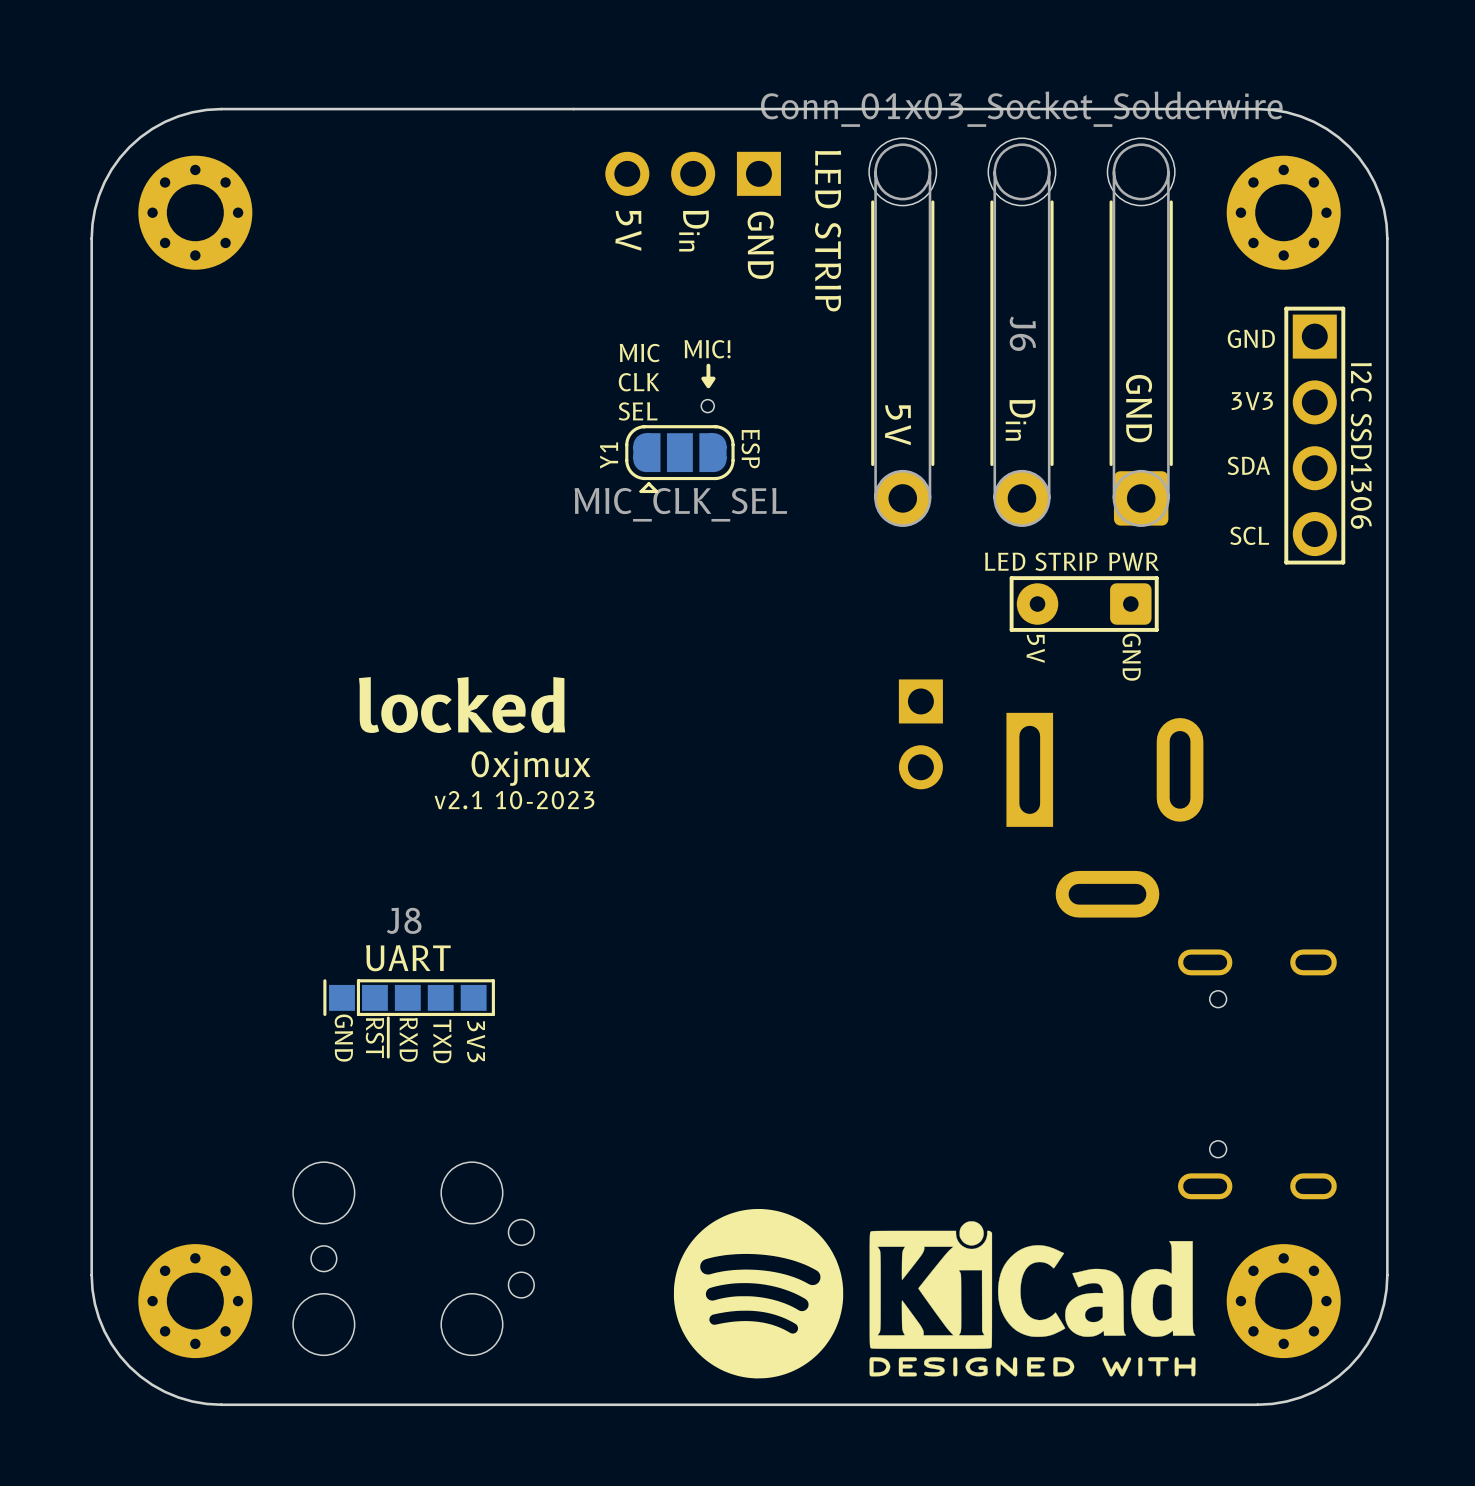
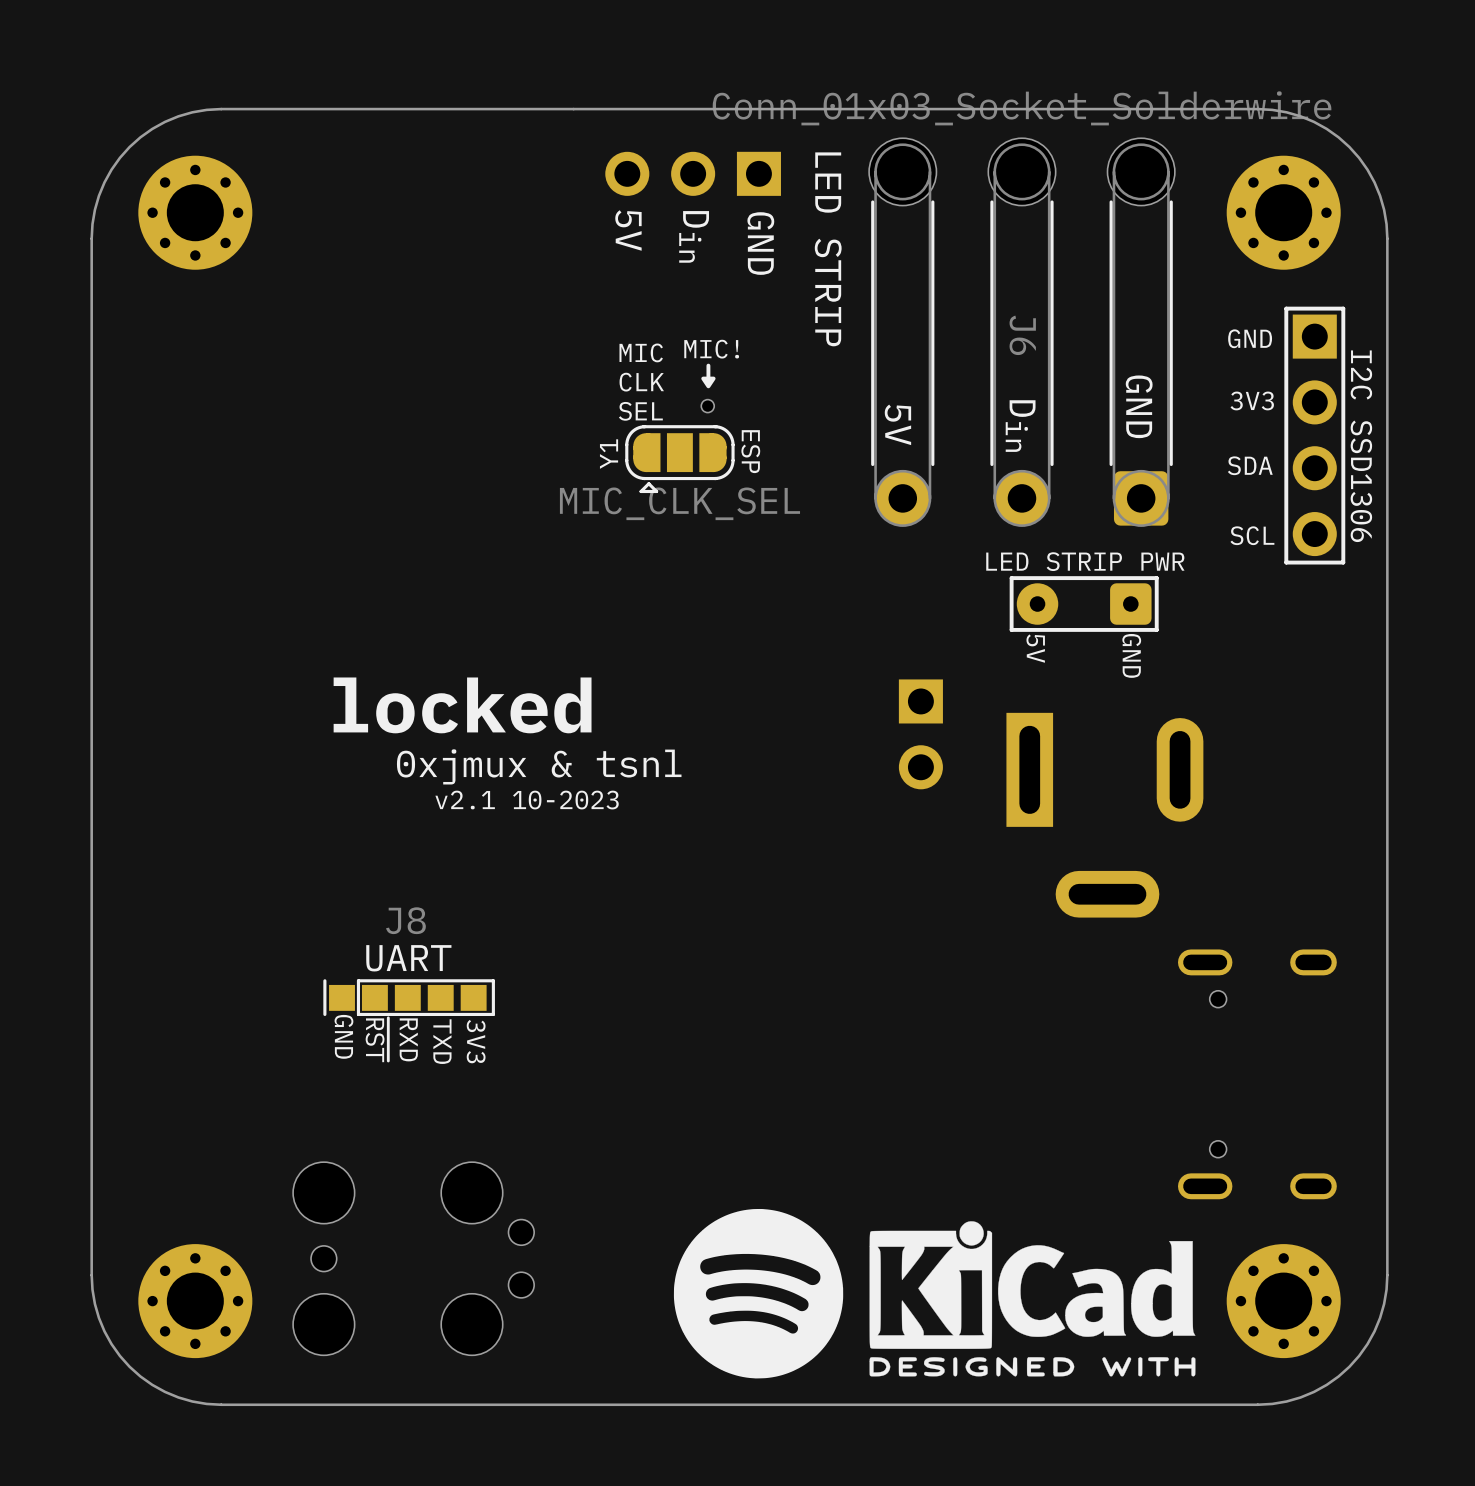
text: 0xjmux (531, 768) -> 0xjmux & tsnl (539, 766)

